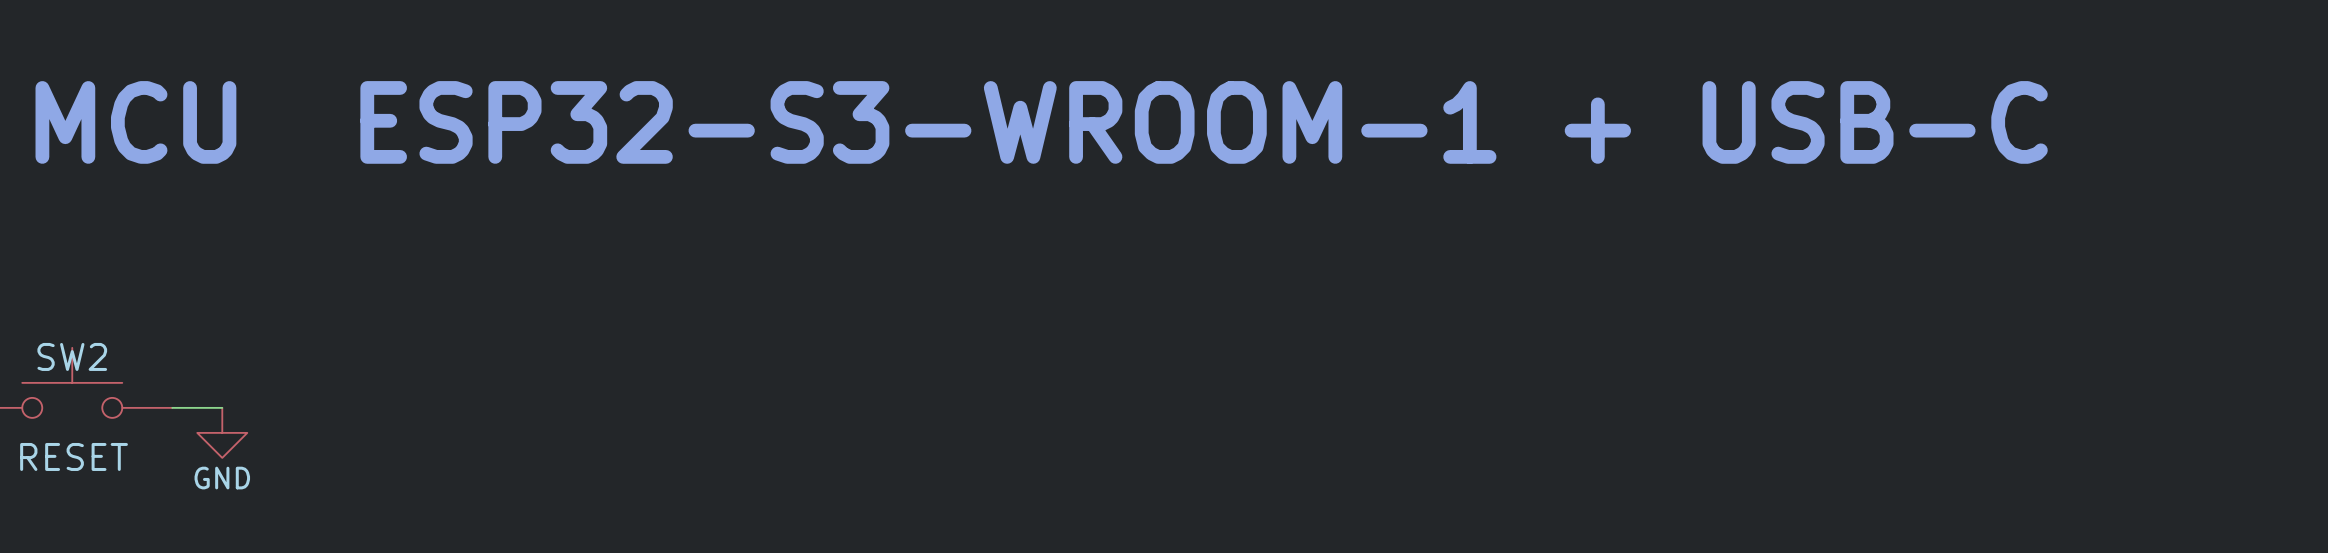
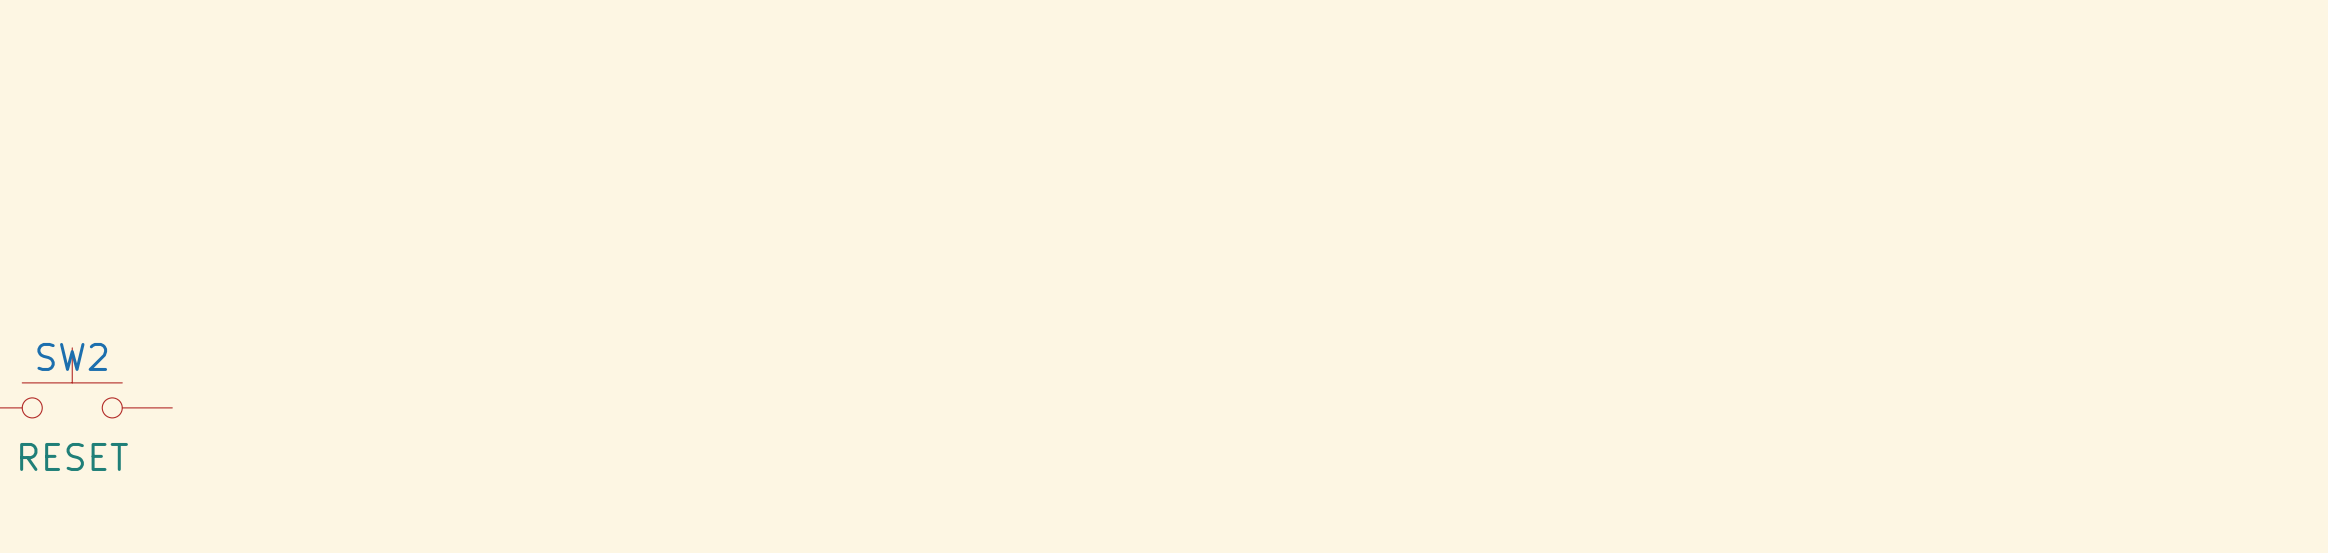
text: MCU ESP32-S3-WROOM-1 + USB-C (1041, 122) -> none
wire: (172, 407) (222, 407) -> none
power symbol: GND (222, 432) -> none

